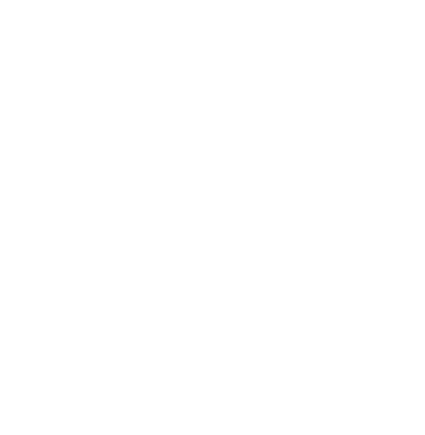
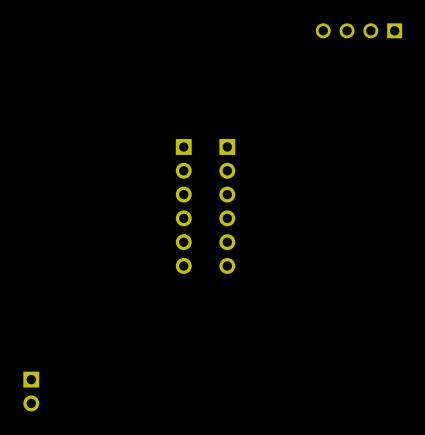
part: none -> (358, 30)
part: none -> (183, 206)
part: none -> (227, 206)
part: none -> (31, 391)

